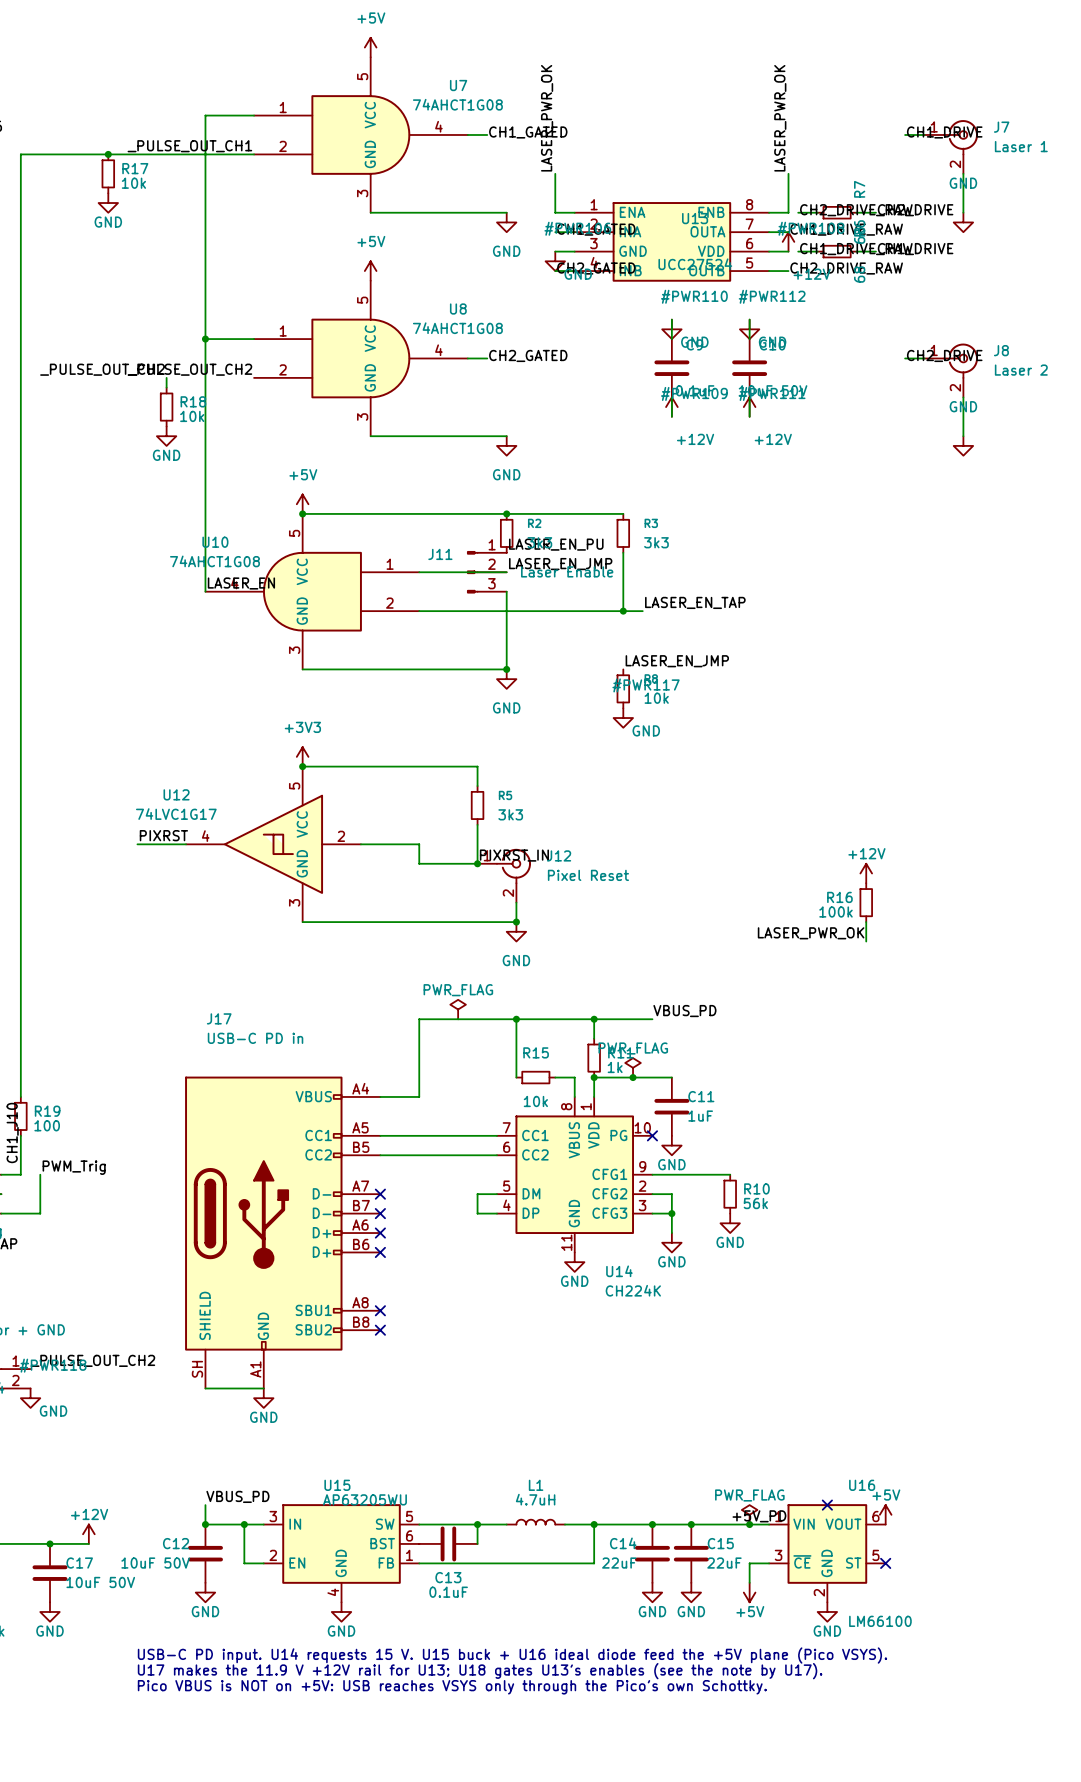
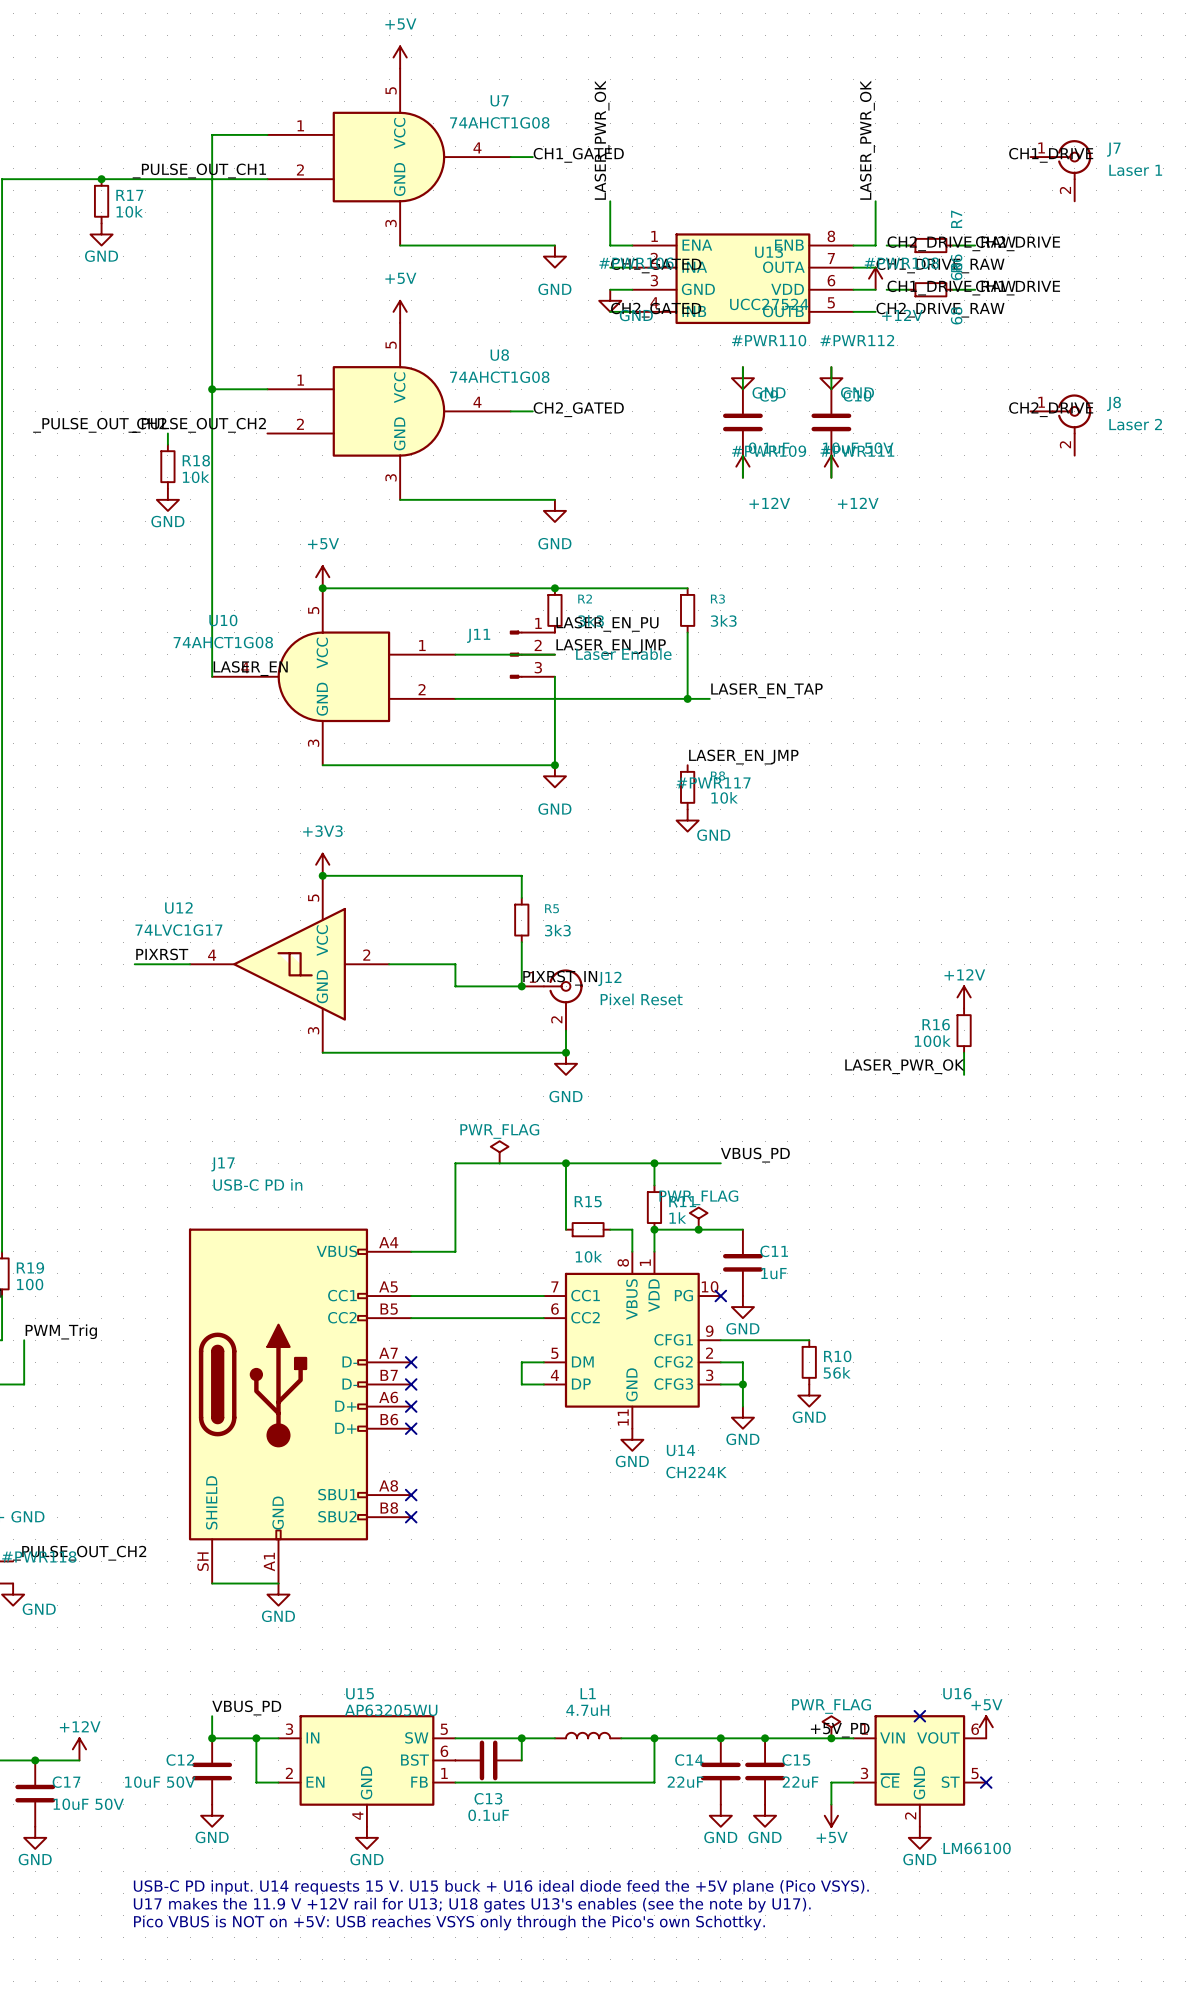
wire: (905, 134) (924, 134) -> none
wire: (963, 173) (963, 212) -> none
power symbol: GND (963, 222) -> none
wire: (905, 358) (924, 358) -> none
wire: (963, 397) (963, 436) -> none
power symbol: GND (963, 445) -> none

